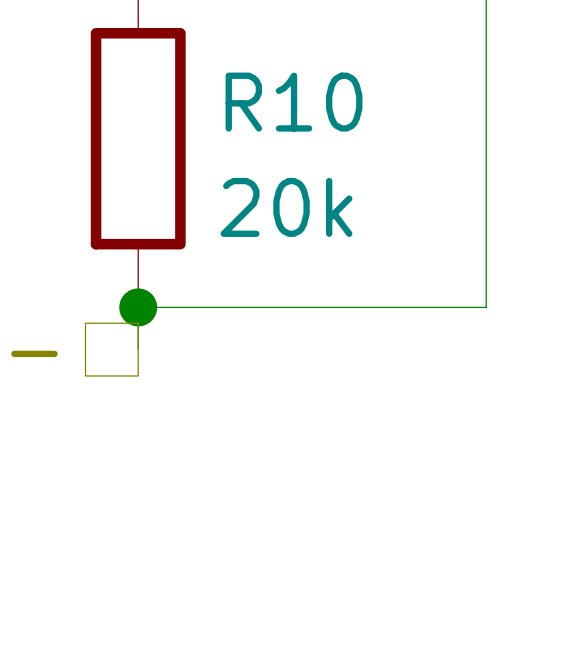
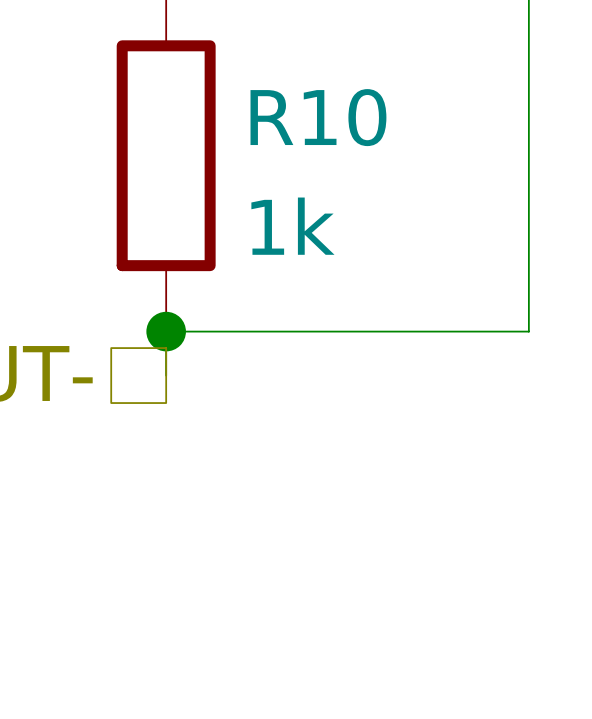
R10 value: 20k (286, 207) -> 1k (292, 226)

